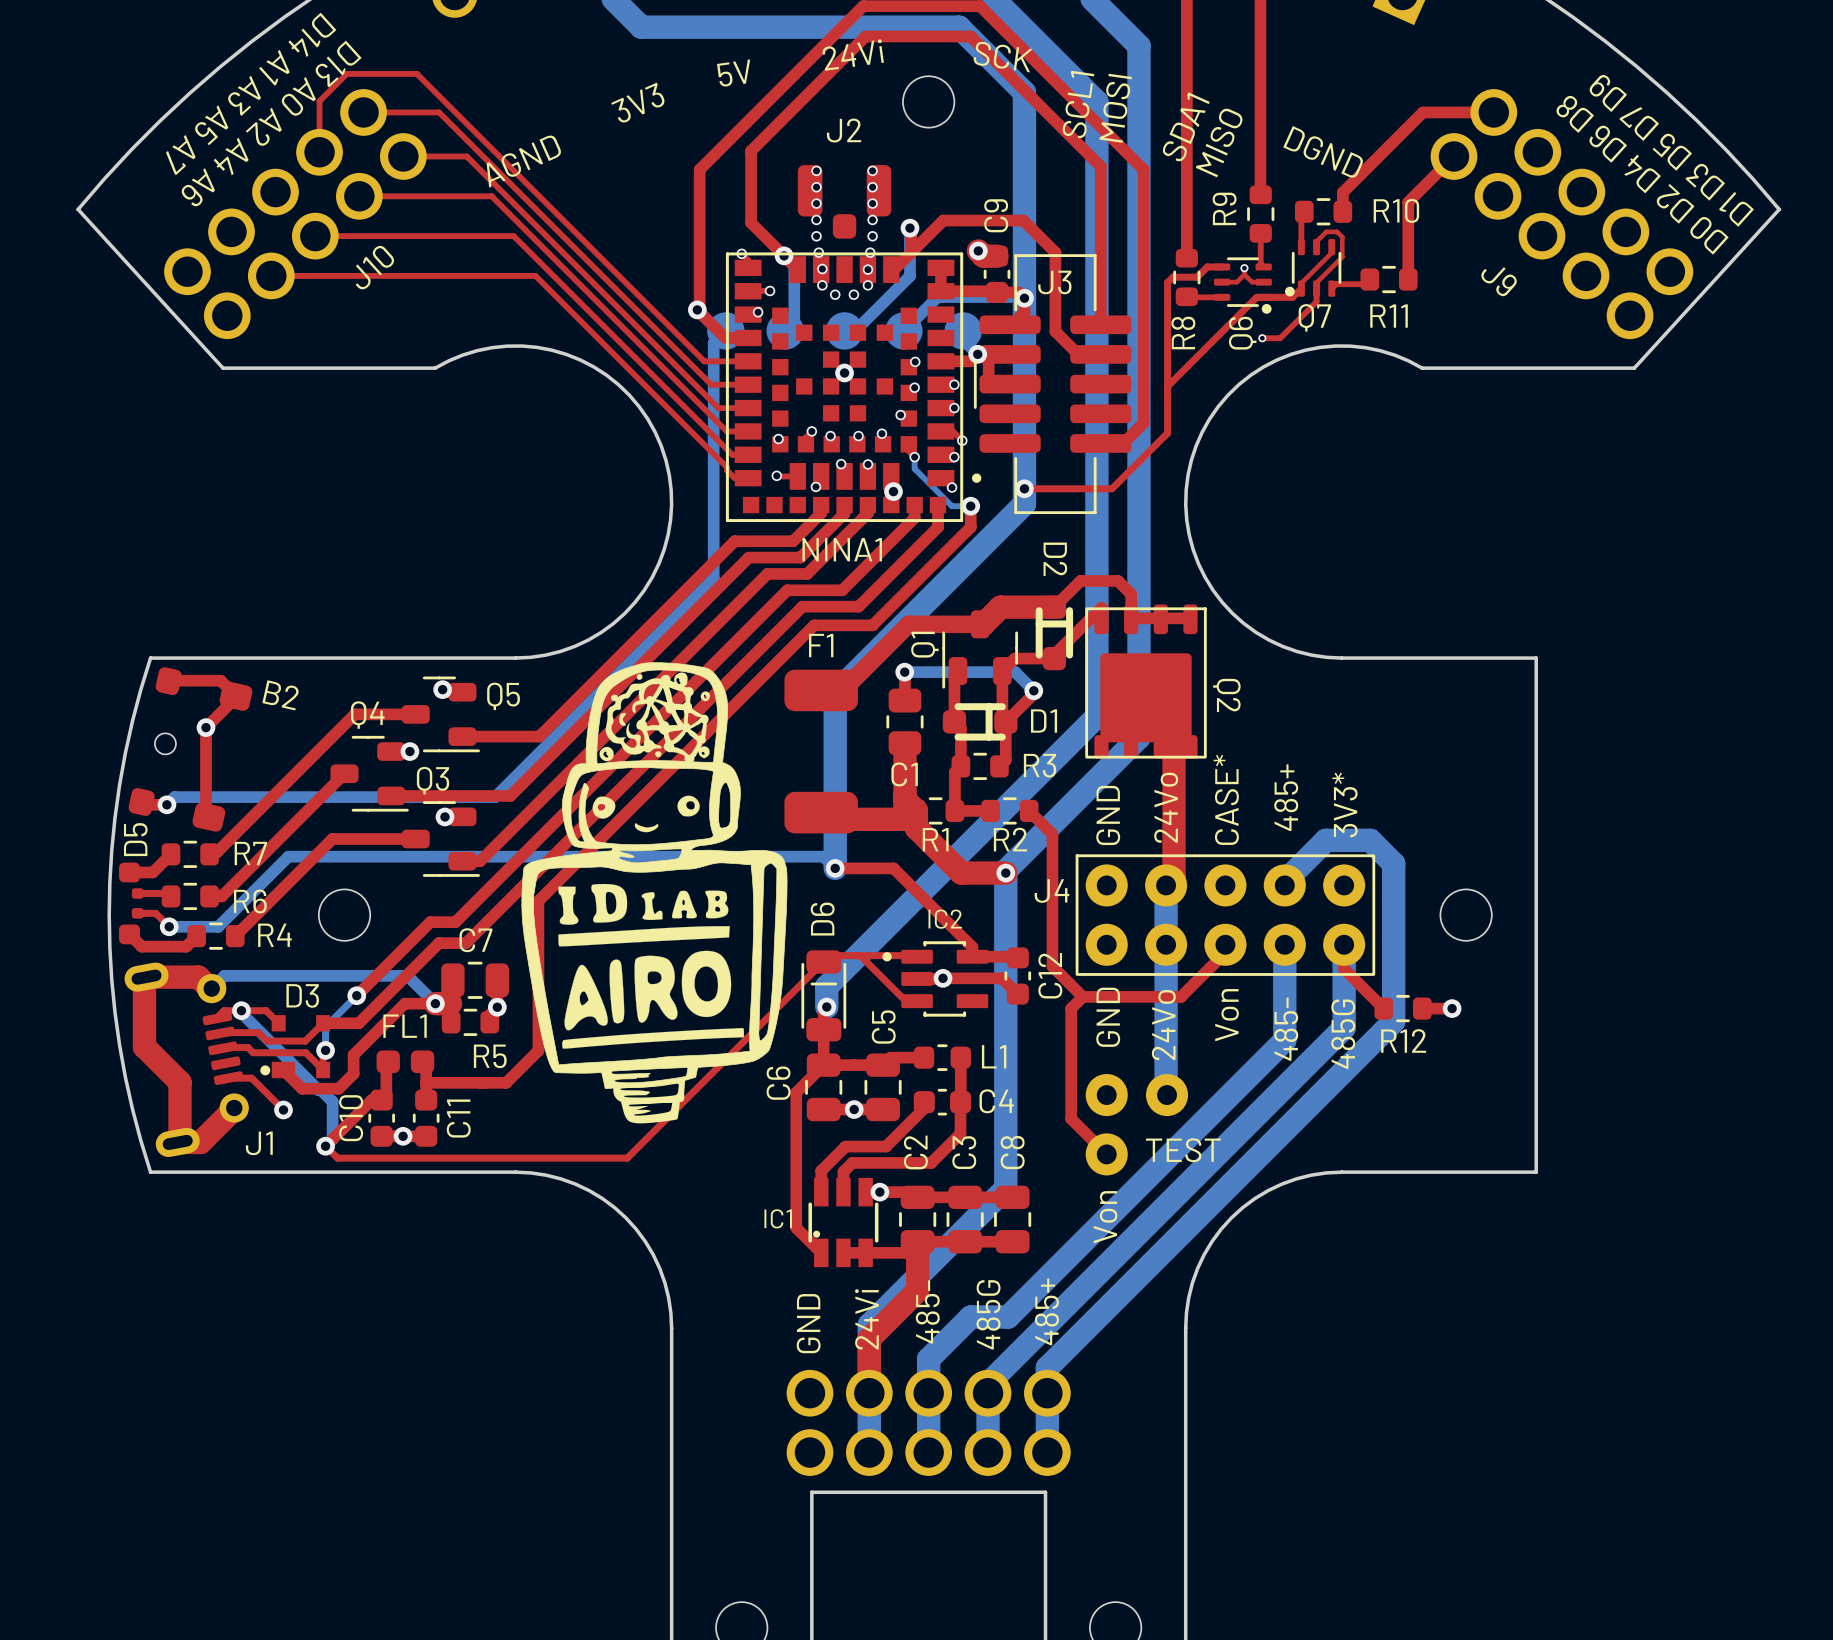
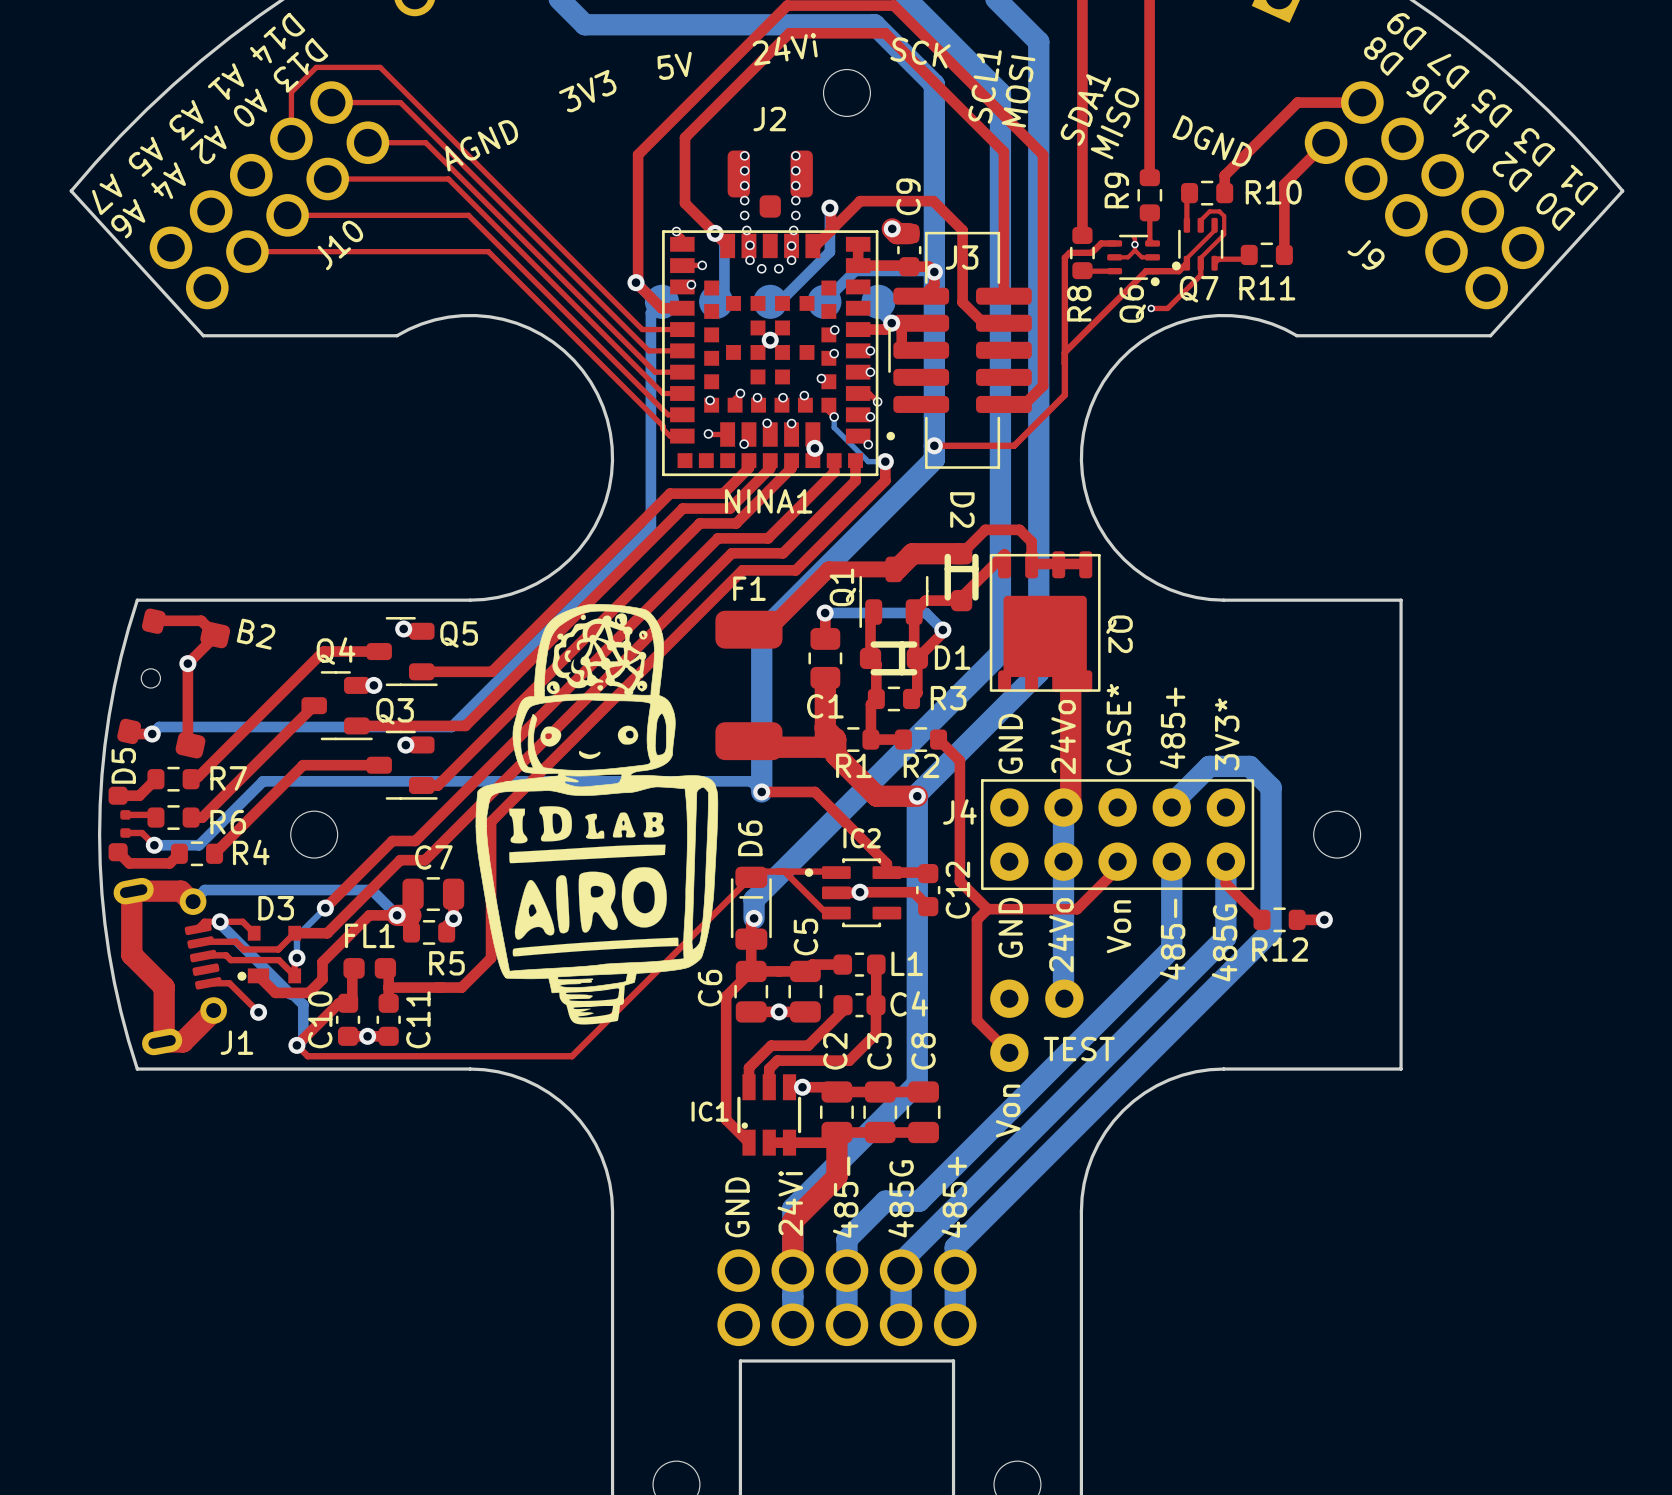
top track: none -> (1133, 237) (1134, 244)

